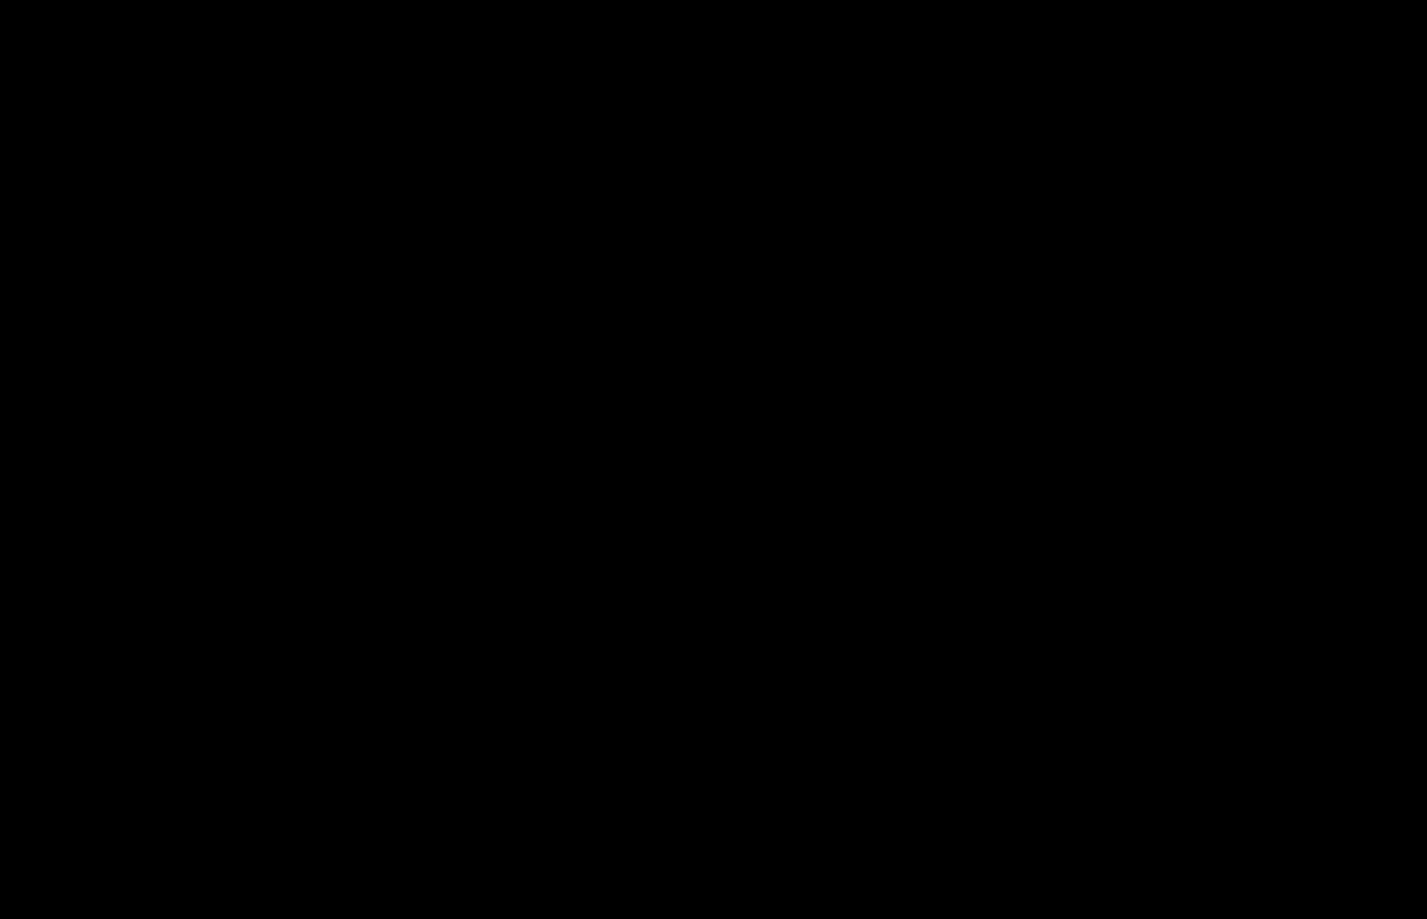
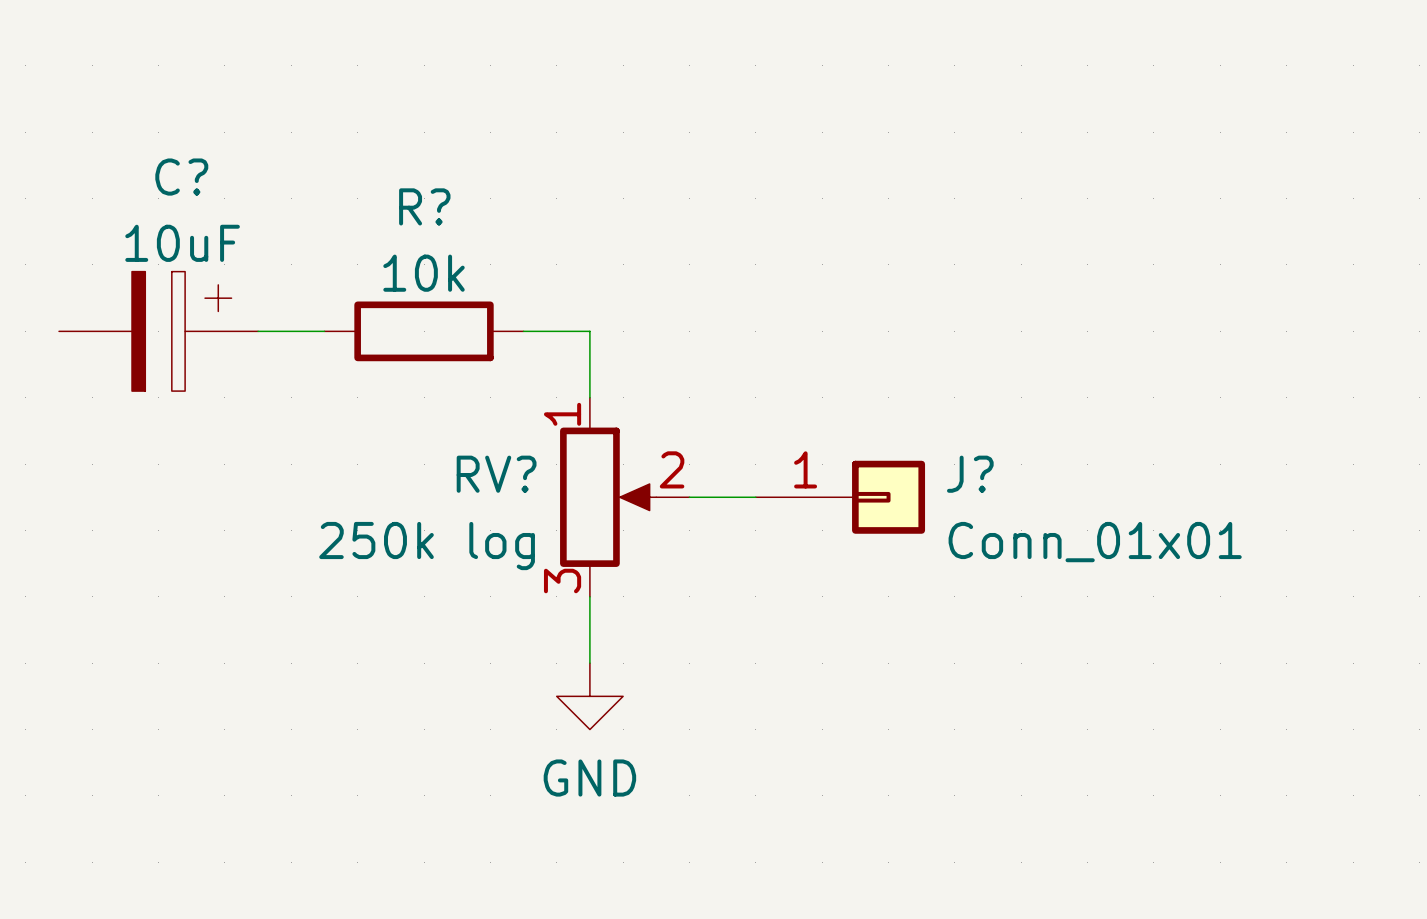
C?: none -> 10uF (158, 331)
wire: none -> (258, 331) (324, 331)
R?: none -> 10k (424, 331)
wire: none -> (523, 331) (589, 331) (589, 397)
RV?: none -> 250k log (624, 497)
wire: none -> (689, 497) (755, 497)
J?: none -> Conn_01x01 (840, 497)
wire: none -> (589, 596) (589, 663)
power symbol: none -> GND (589, 696)

